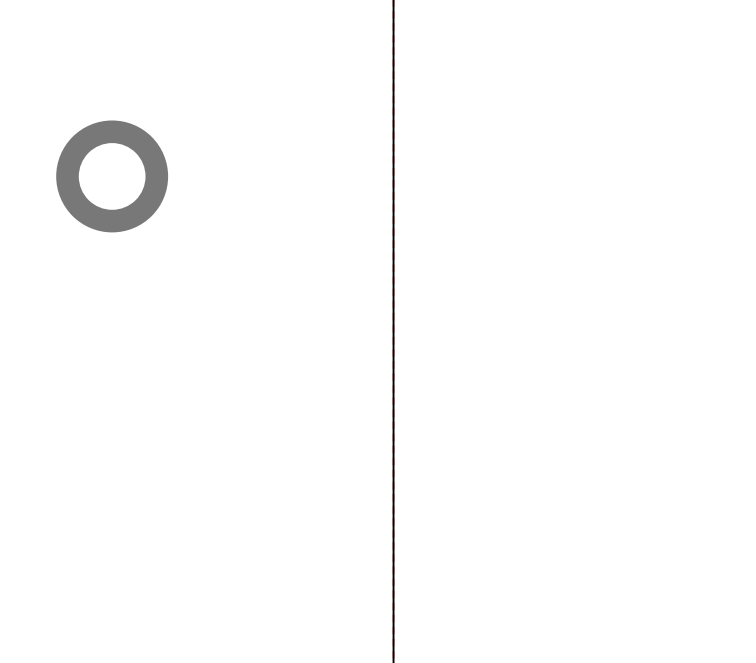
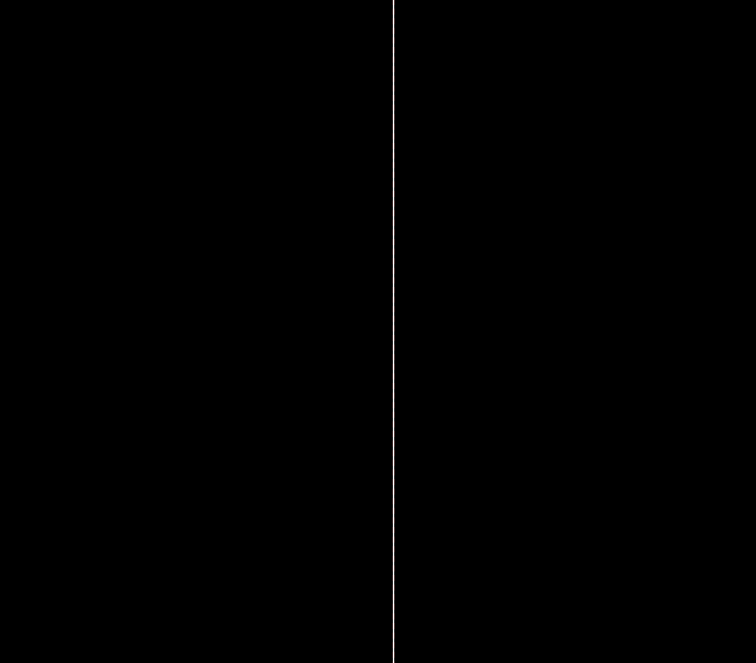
via: (112, 176) -> none

